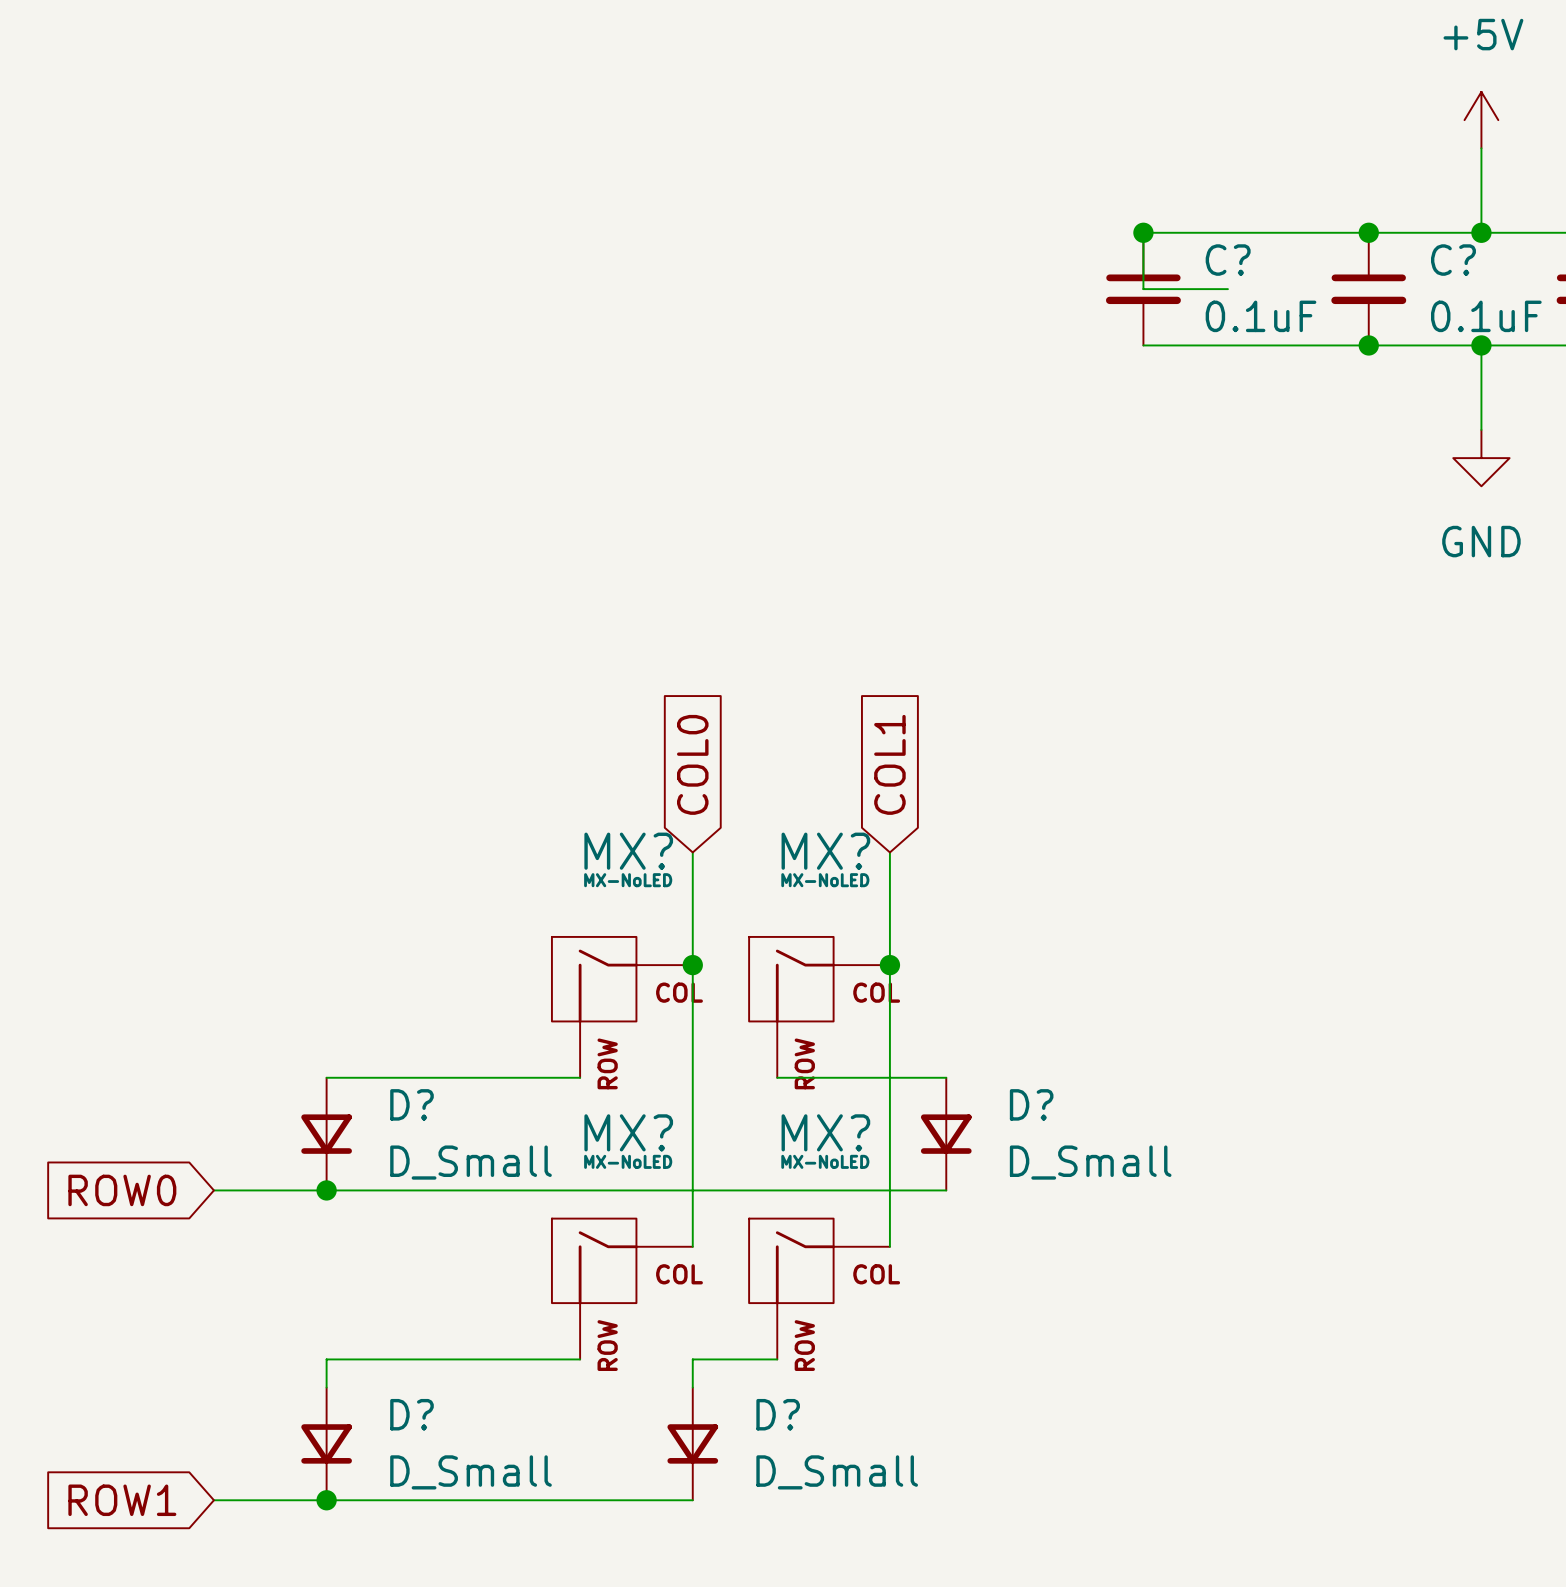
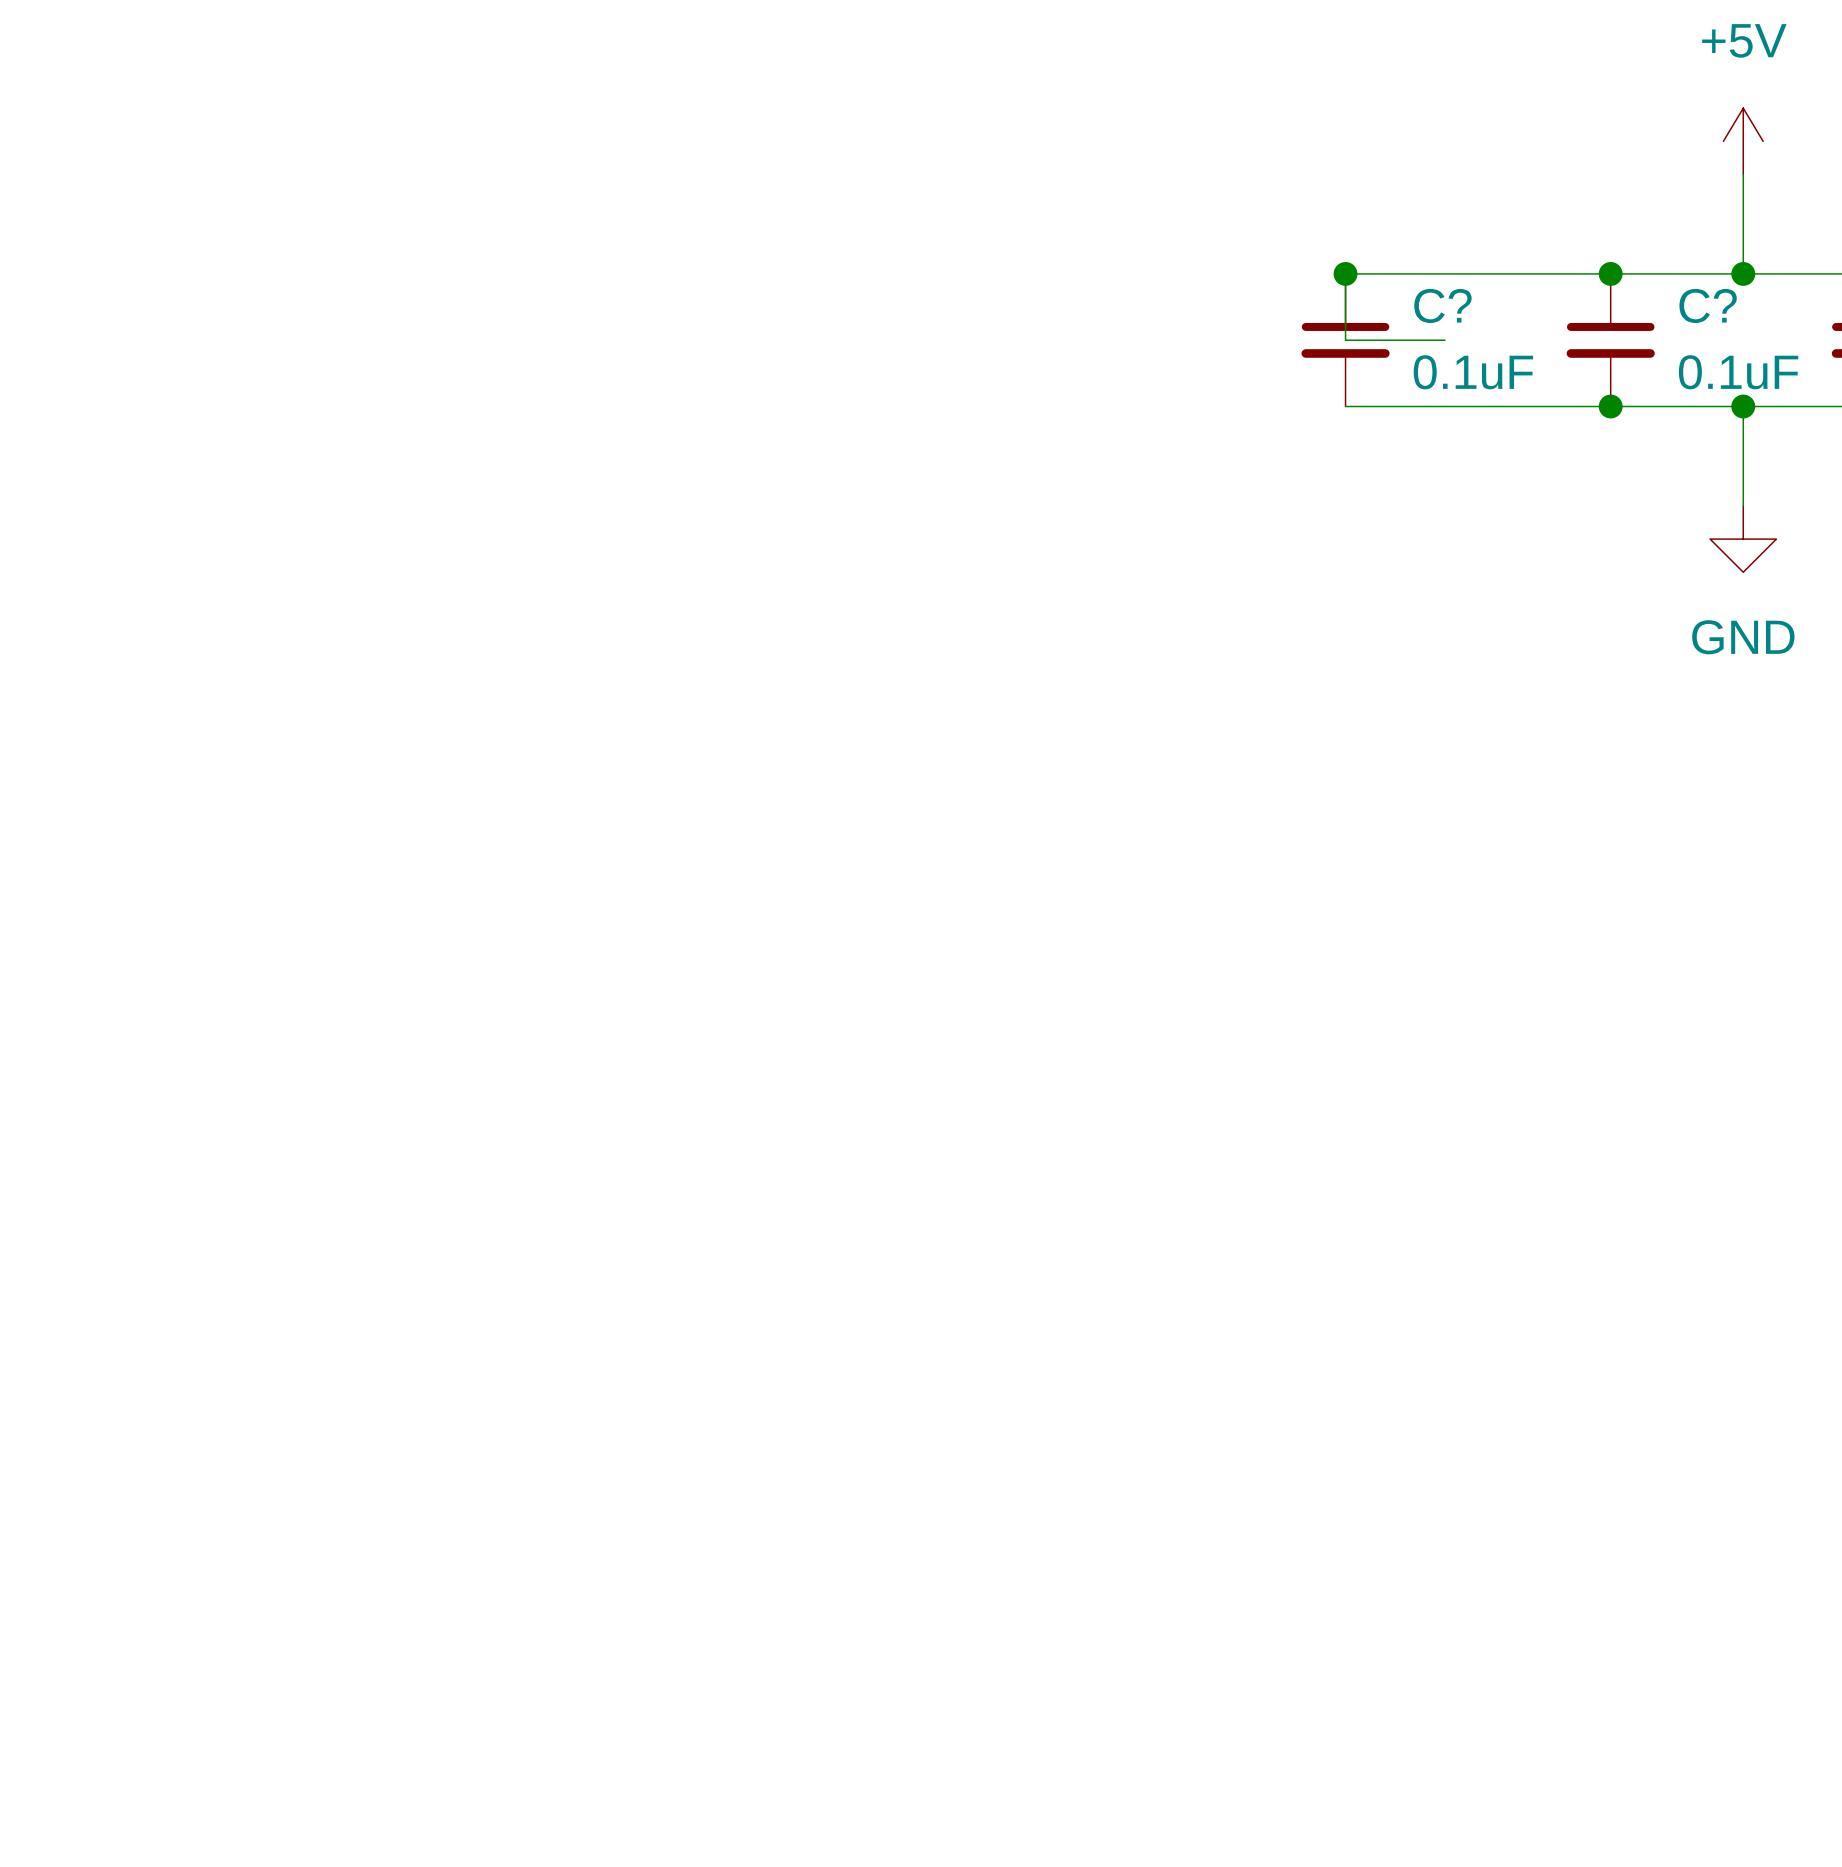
global label: COL0 (692, 764) -> none
global label: COL1 (889, 764) -> none
wire: (692, 852) (692, 1246) -> none
wire: (889, 852) (889, 1246) -> none
junction: (692, 965) -> none
junction: (889, 965) -> none
MX?: MX-NoLED (622, 1007) -> none
MX?: MX-NoLED (819, 1007) -> none
wire: (326, 1077) (580, 1077) -> none
wire: (777, 1077) (946, 1077) -> none
D?: D_Small (326, 1134) -> none
D?: D_Small (946, 1134) -> none
global label: ROW0 (122, 1190) -> none
wire: (213, 1190) (946, 1190) -> none
junction: (326, 1190) -> none
MX?: MX-NoLED (622, 1289) -> none
MX?: MX-NoLED (819, 1289) -> none
wire: (580, 1359) (326, 1359) (326, 1387) -> none
wire: (777, 1359) (692, 1359) (692, 1387) -> none
D?: D_Small (326, 1443) -> none
D?: D_Small (692, 1443) -> none
global label: ROW1 (122, 1500) -> none
wire: (213, 1500) (692, 1500) -> none
junction: (326, 1500) -> none

